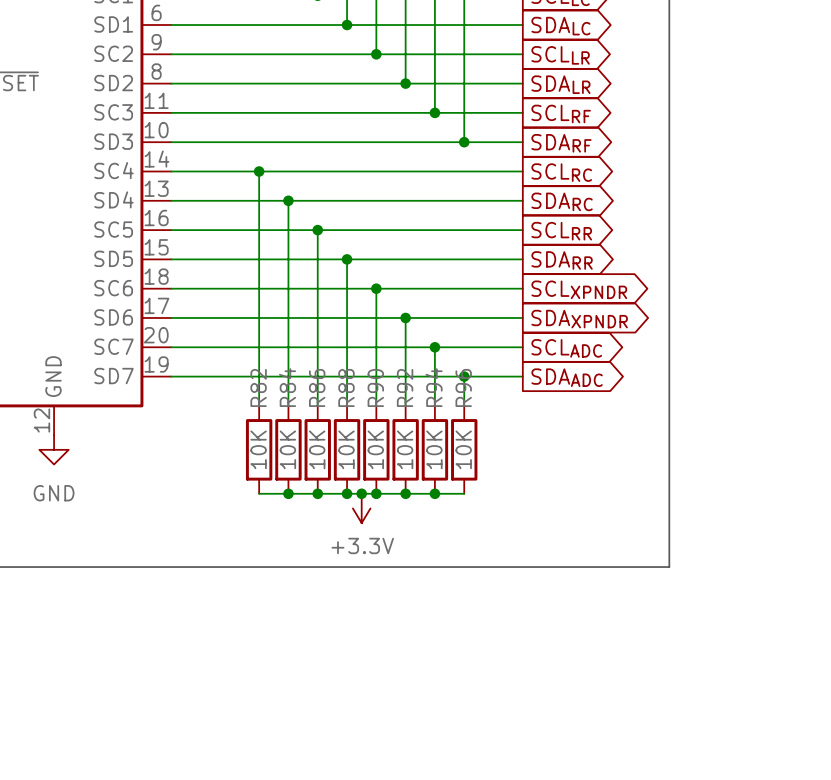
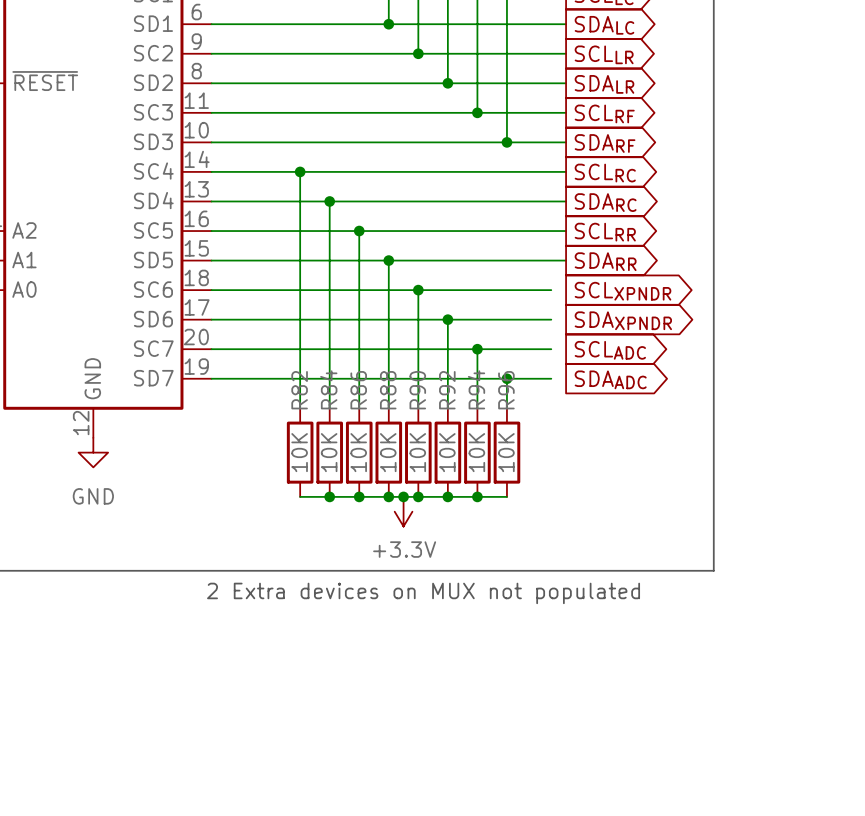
wire: (508, 288) (522, 288) -> none
wire: (508, 317) (522, 317) -> none
wire: (508, 347) (522, 347) -> none
wire: (508, 376) (522, 376) -> none
text: none -> 2 Extra devices on MUX not populated (423, 593)

